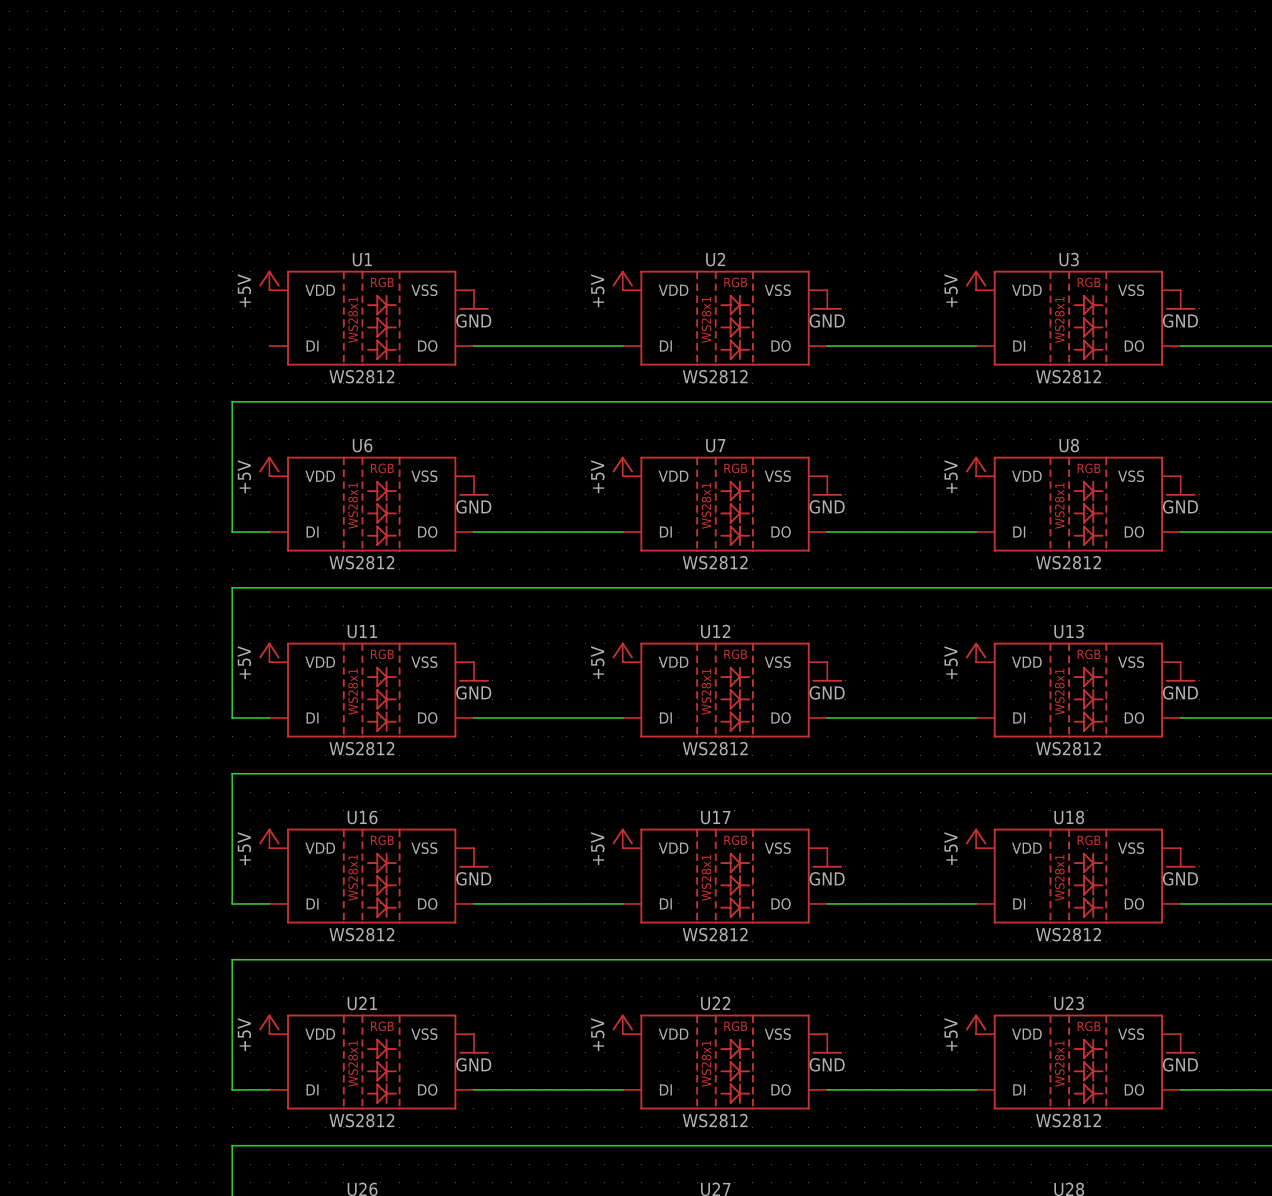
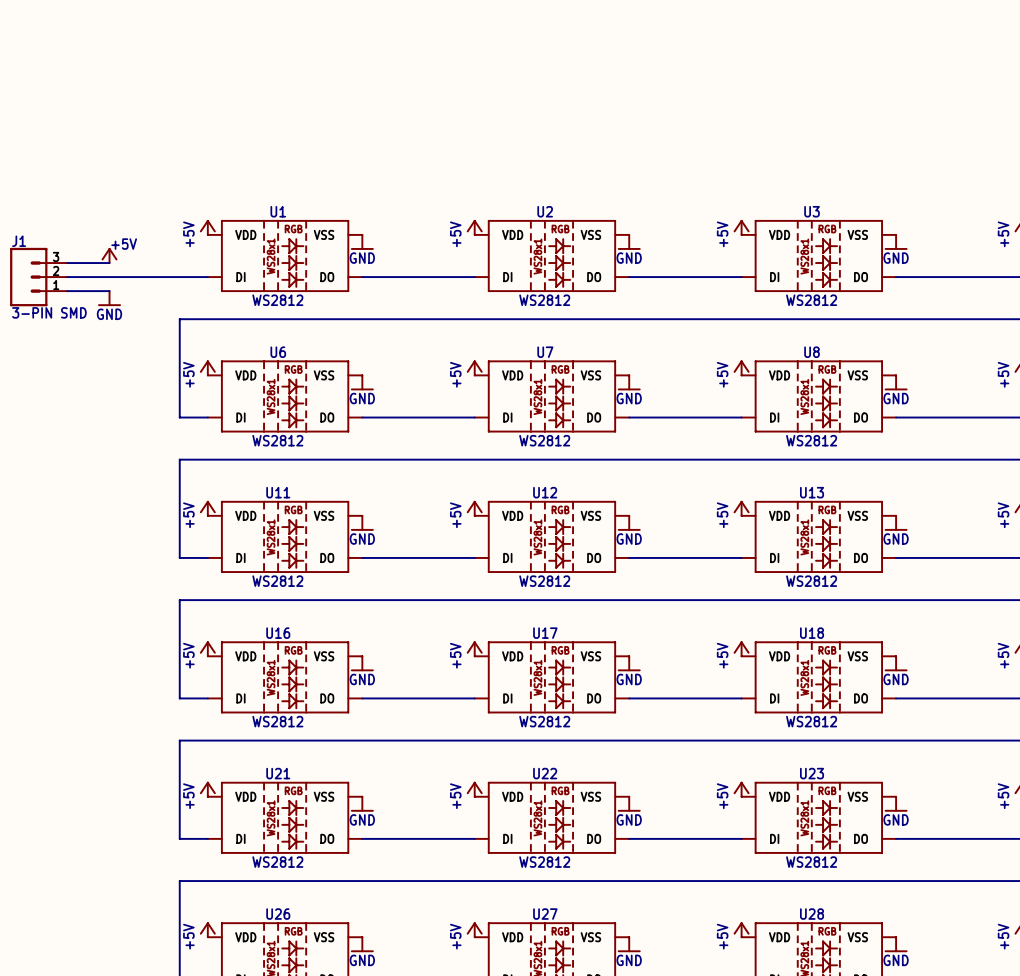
power symbol: none -> +5V (109, 255)
wire: none -> (67, 263) (109, 263)
J1: none -> 3-PIN SMD (38, 277)
wire: none -> (67, 277) (207, 277)
wire: none -> (67, 291) (109, 291)
power symbol: none -> GND (109, 298)

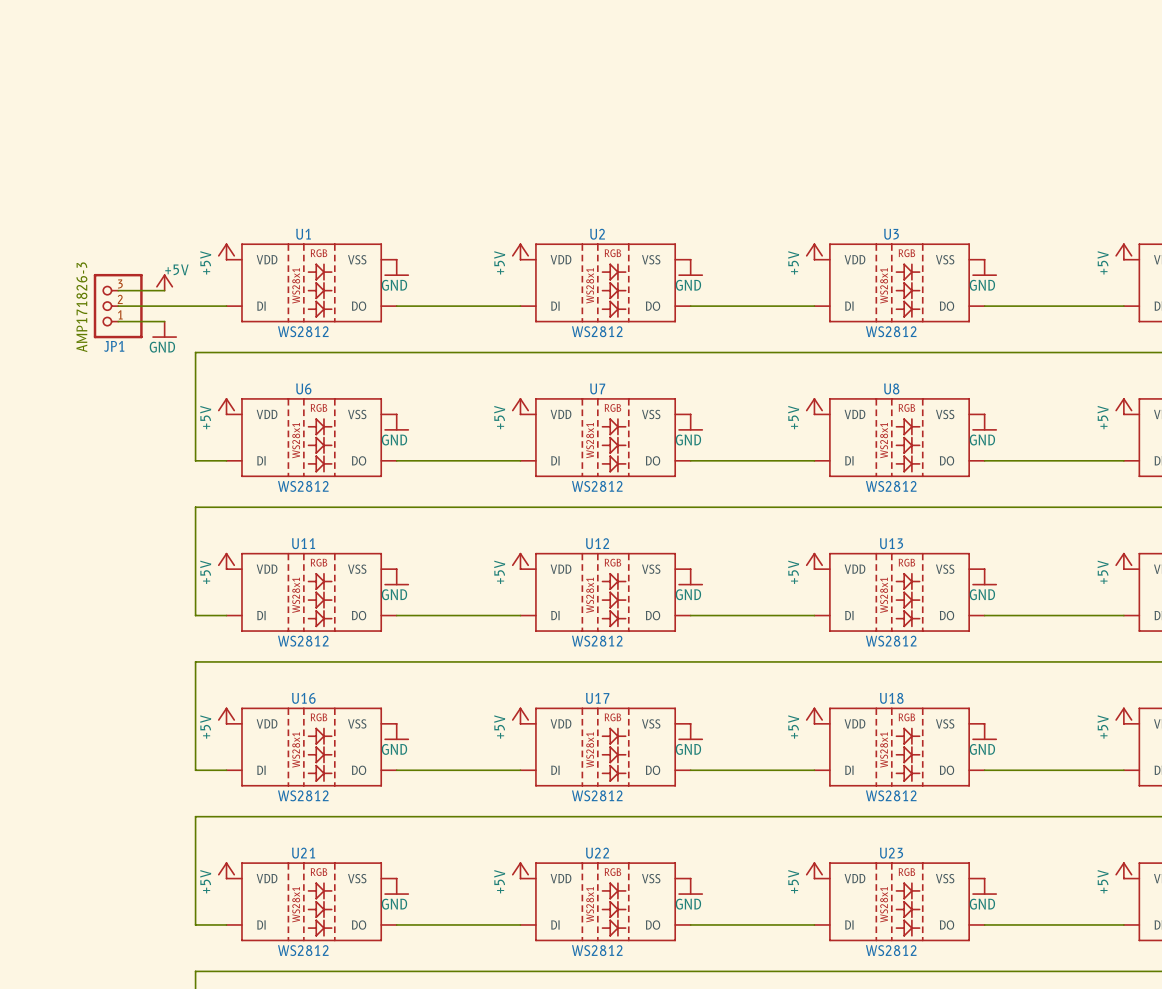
power symbol position: +5V (109, 255) -> +5V (164, 282)
wire: (67, 263) (109, 263) -> (164, 290) (118, 290)
text: none -> AMP171826-3 (81, 307)
J1: 3-PIN SMD (38, 277) -> none
wire: (67, 277) (109, 277) -> none
JP1: none -> (118, 306)
wire: (67, 291) (109, 291) -> (164, 321) (118, 321)
power symbol position: GND (109, 298) -> GND (164, 329)

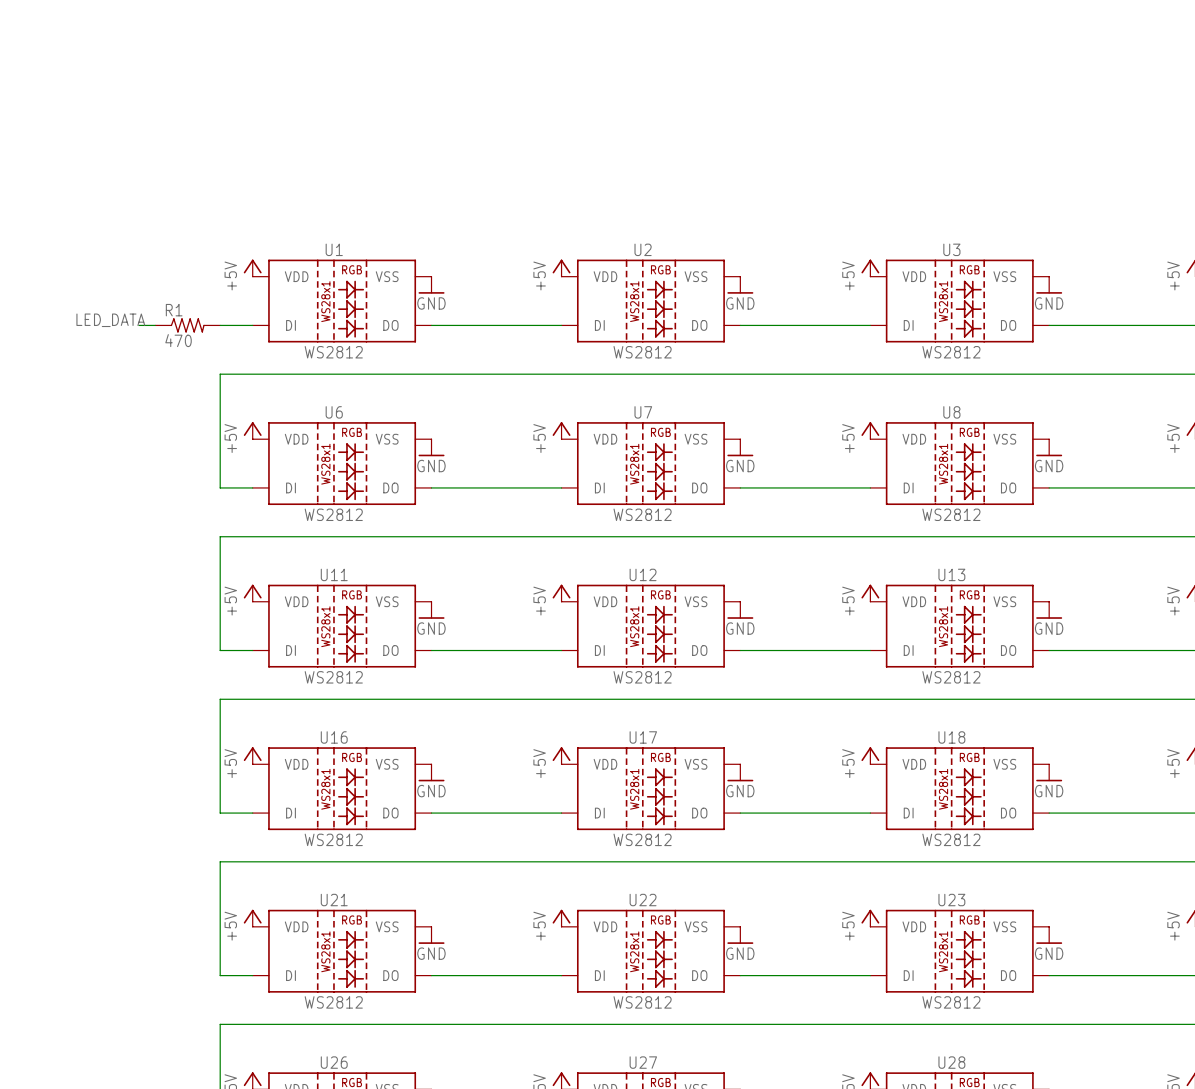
power symbol: +5V (164, 282) -> none
wire: (118, 290) (164, 290) -> none
label: none -> LED_DATA (110, 320)
JP1: (118, 306) -> none
R1: none -> 470 (187, 325)
text: AMP171826-3 (81, 307) -> none
wire: (118, 321) (164, 321) -> none
power symbol: GND (164, 329) -> none

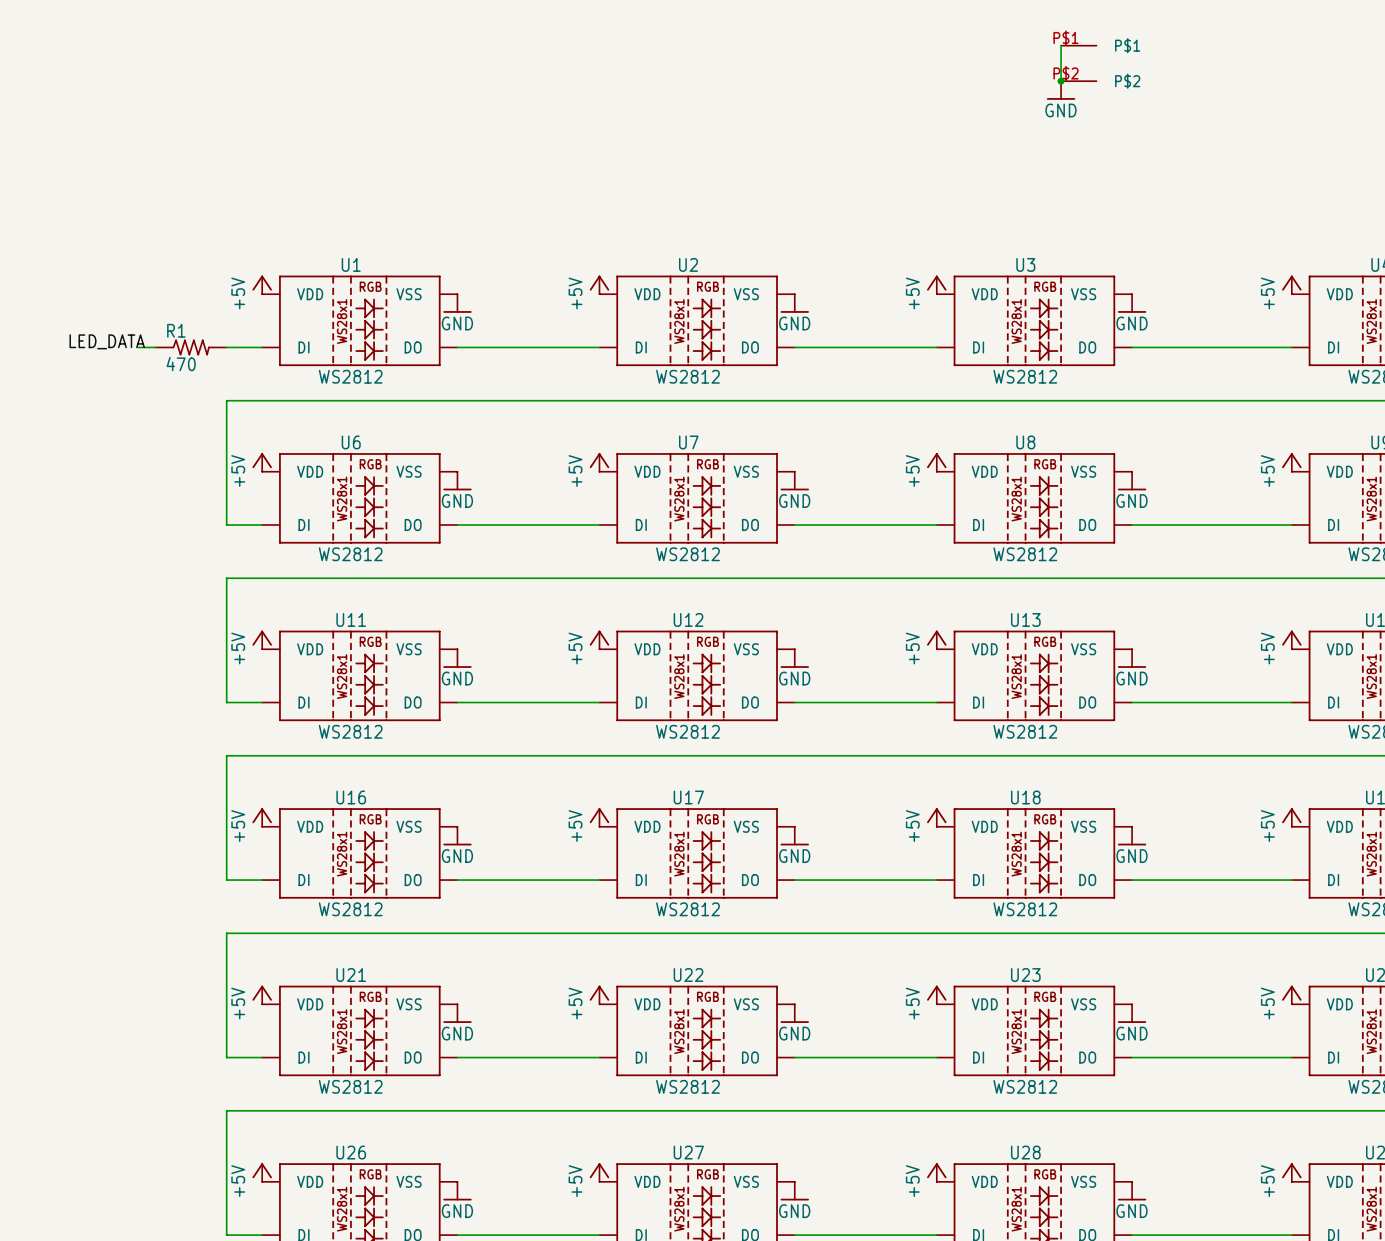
wire: none -> (1061, 45) (1061, 81)
part: none -> (1078, 63)
junction: none -> (1061, 81)
power symbol: none -> GND (1061, 90)

